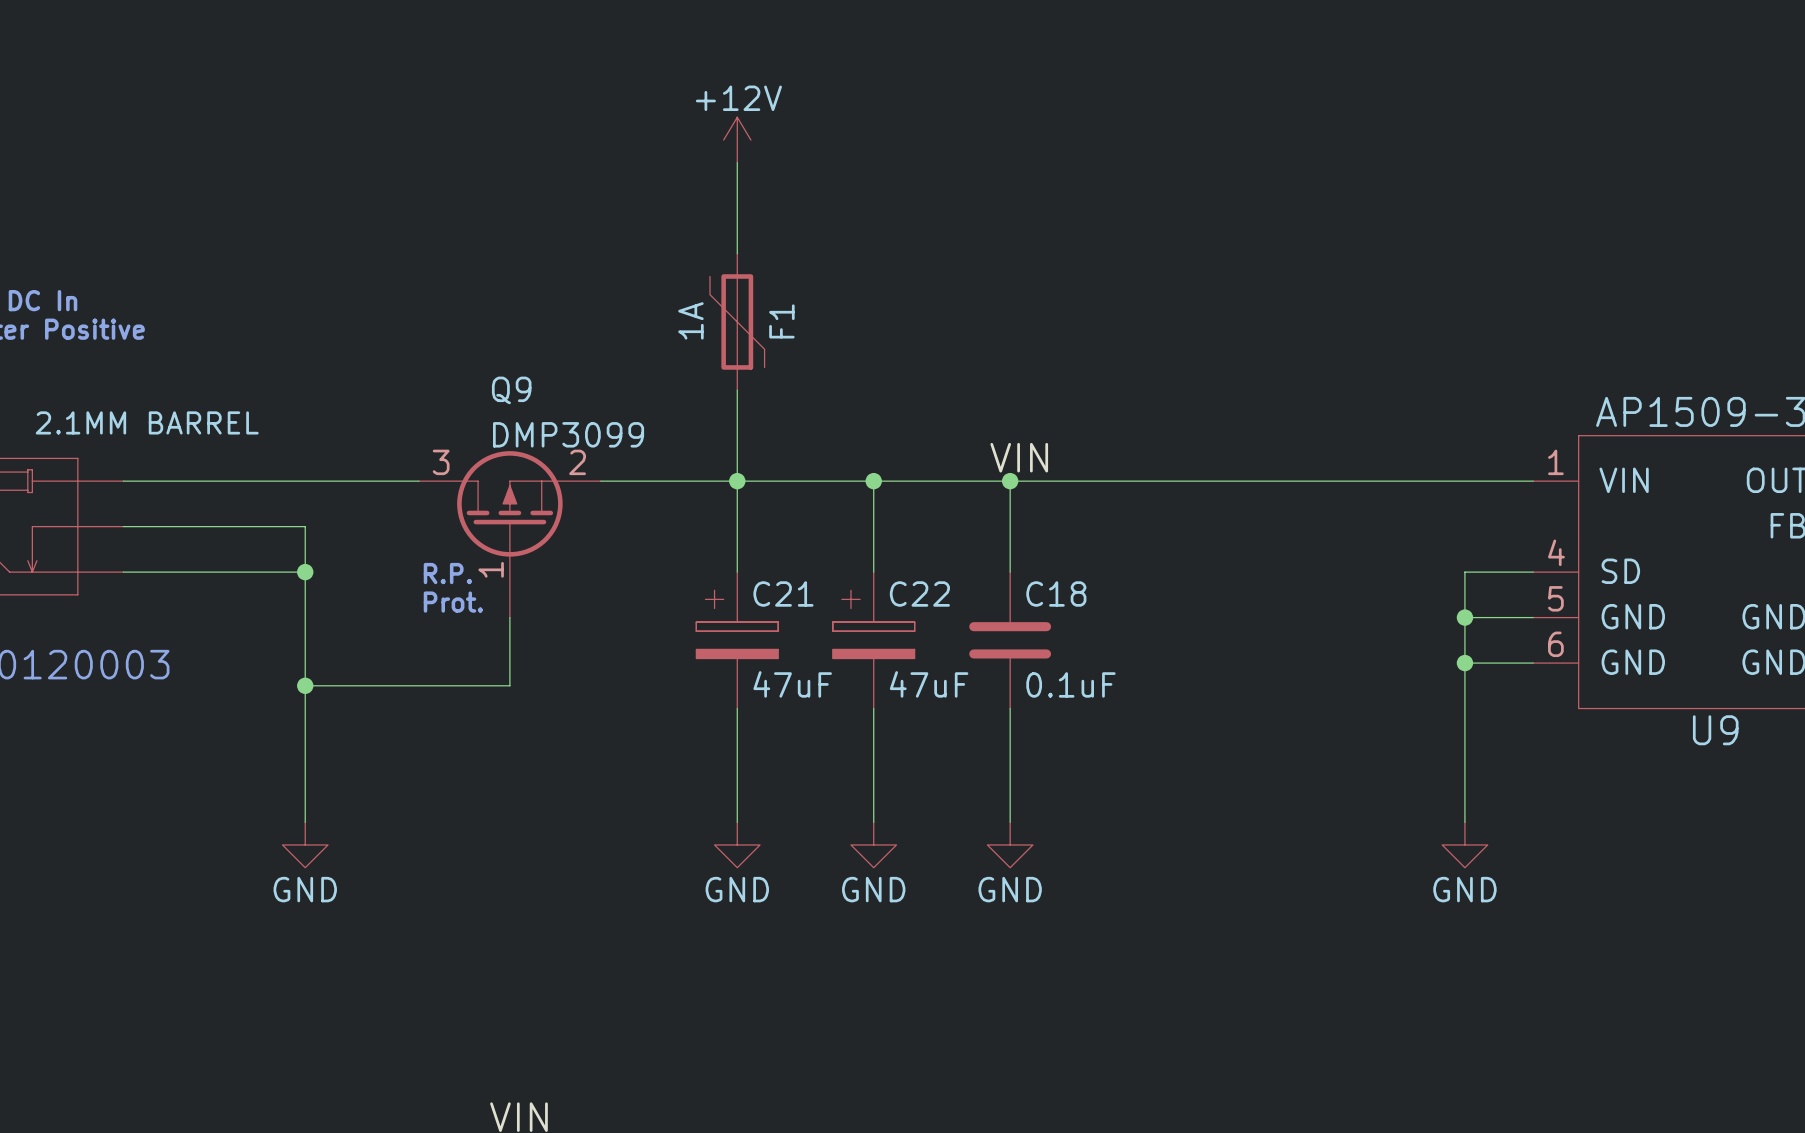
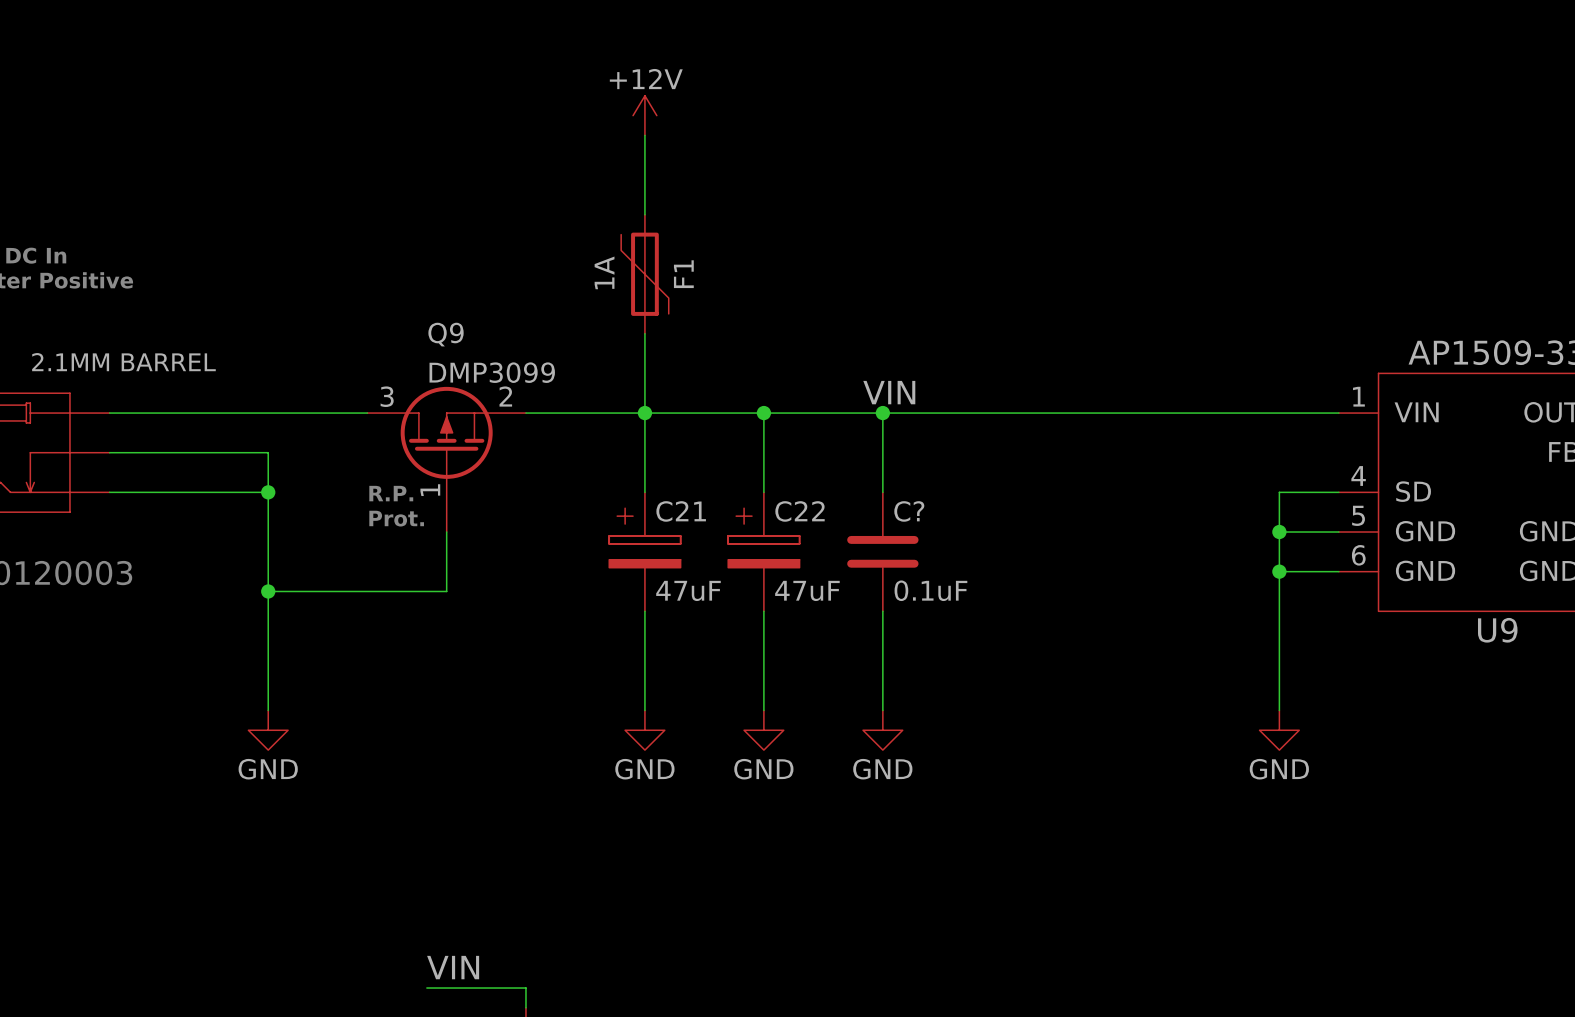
C18 name: C18 (1056, 593) -> C? (909, 511)

